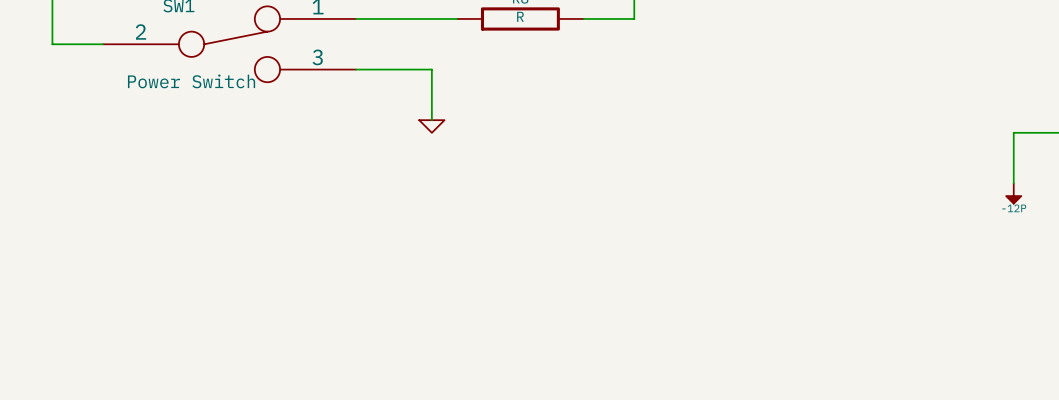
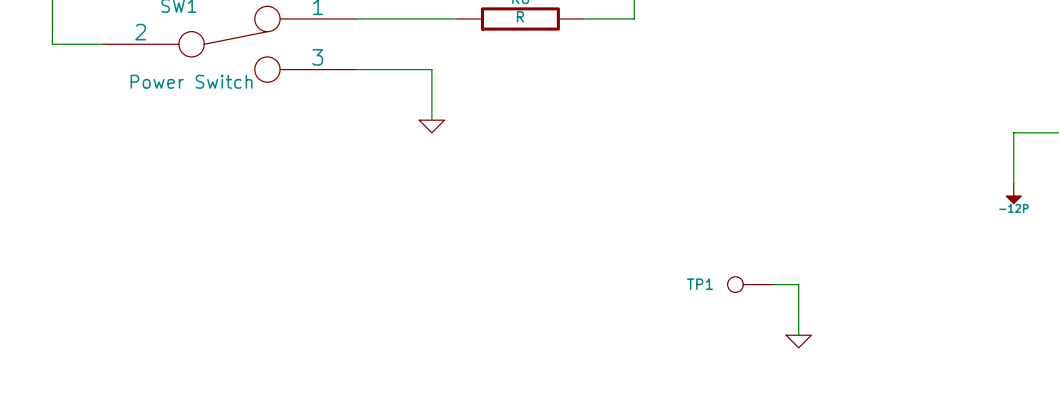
TP1: none -> (750, 284)
wire: none -> (773, 284) (798, 284) (798, 335)
power symbol: none -> (798, 341)

